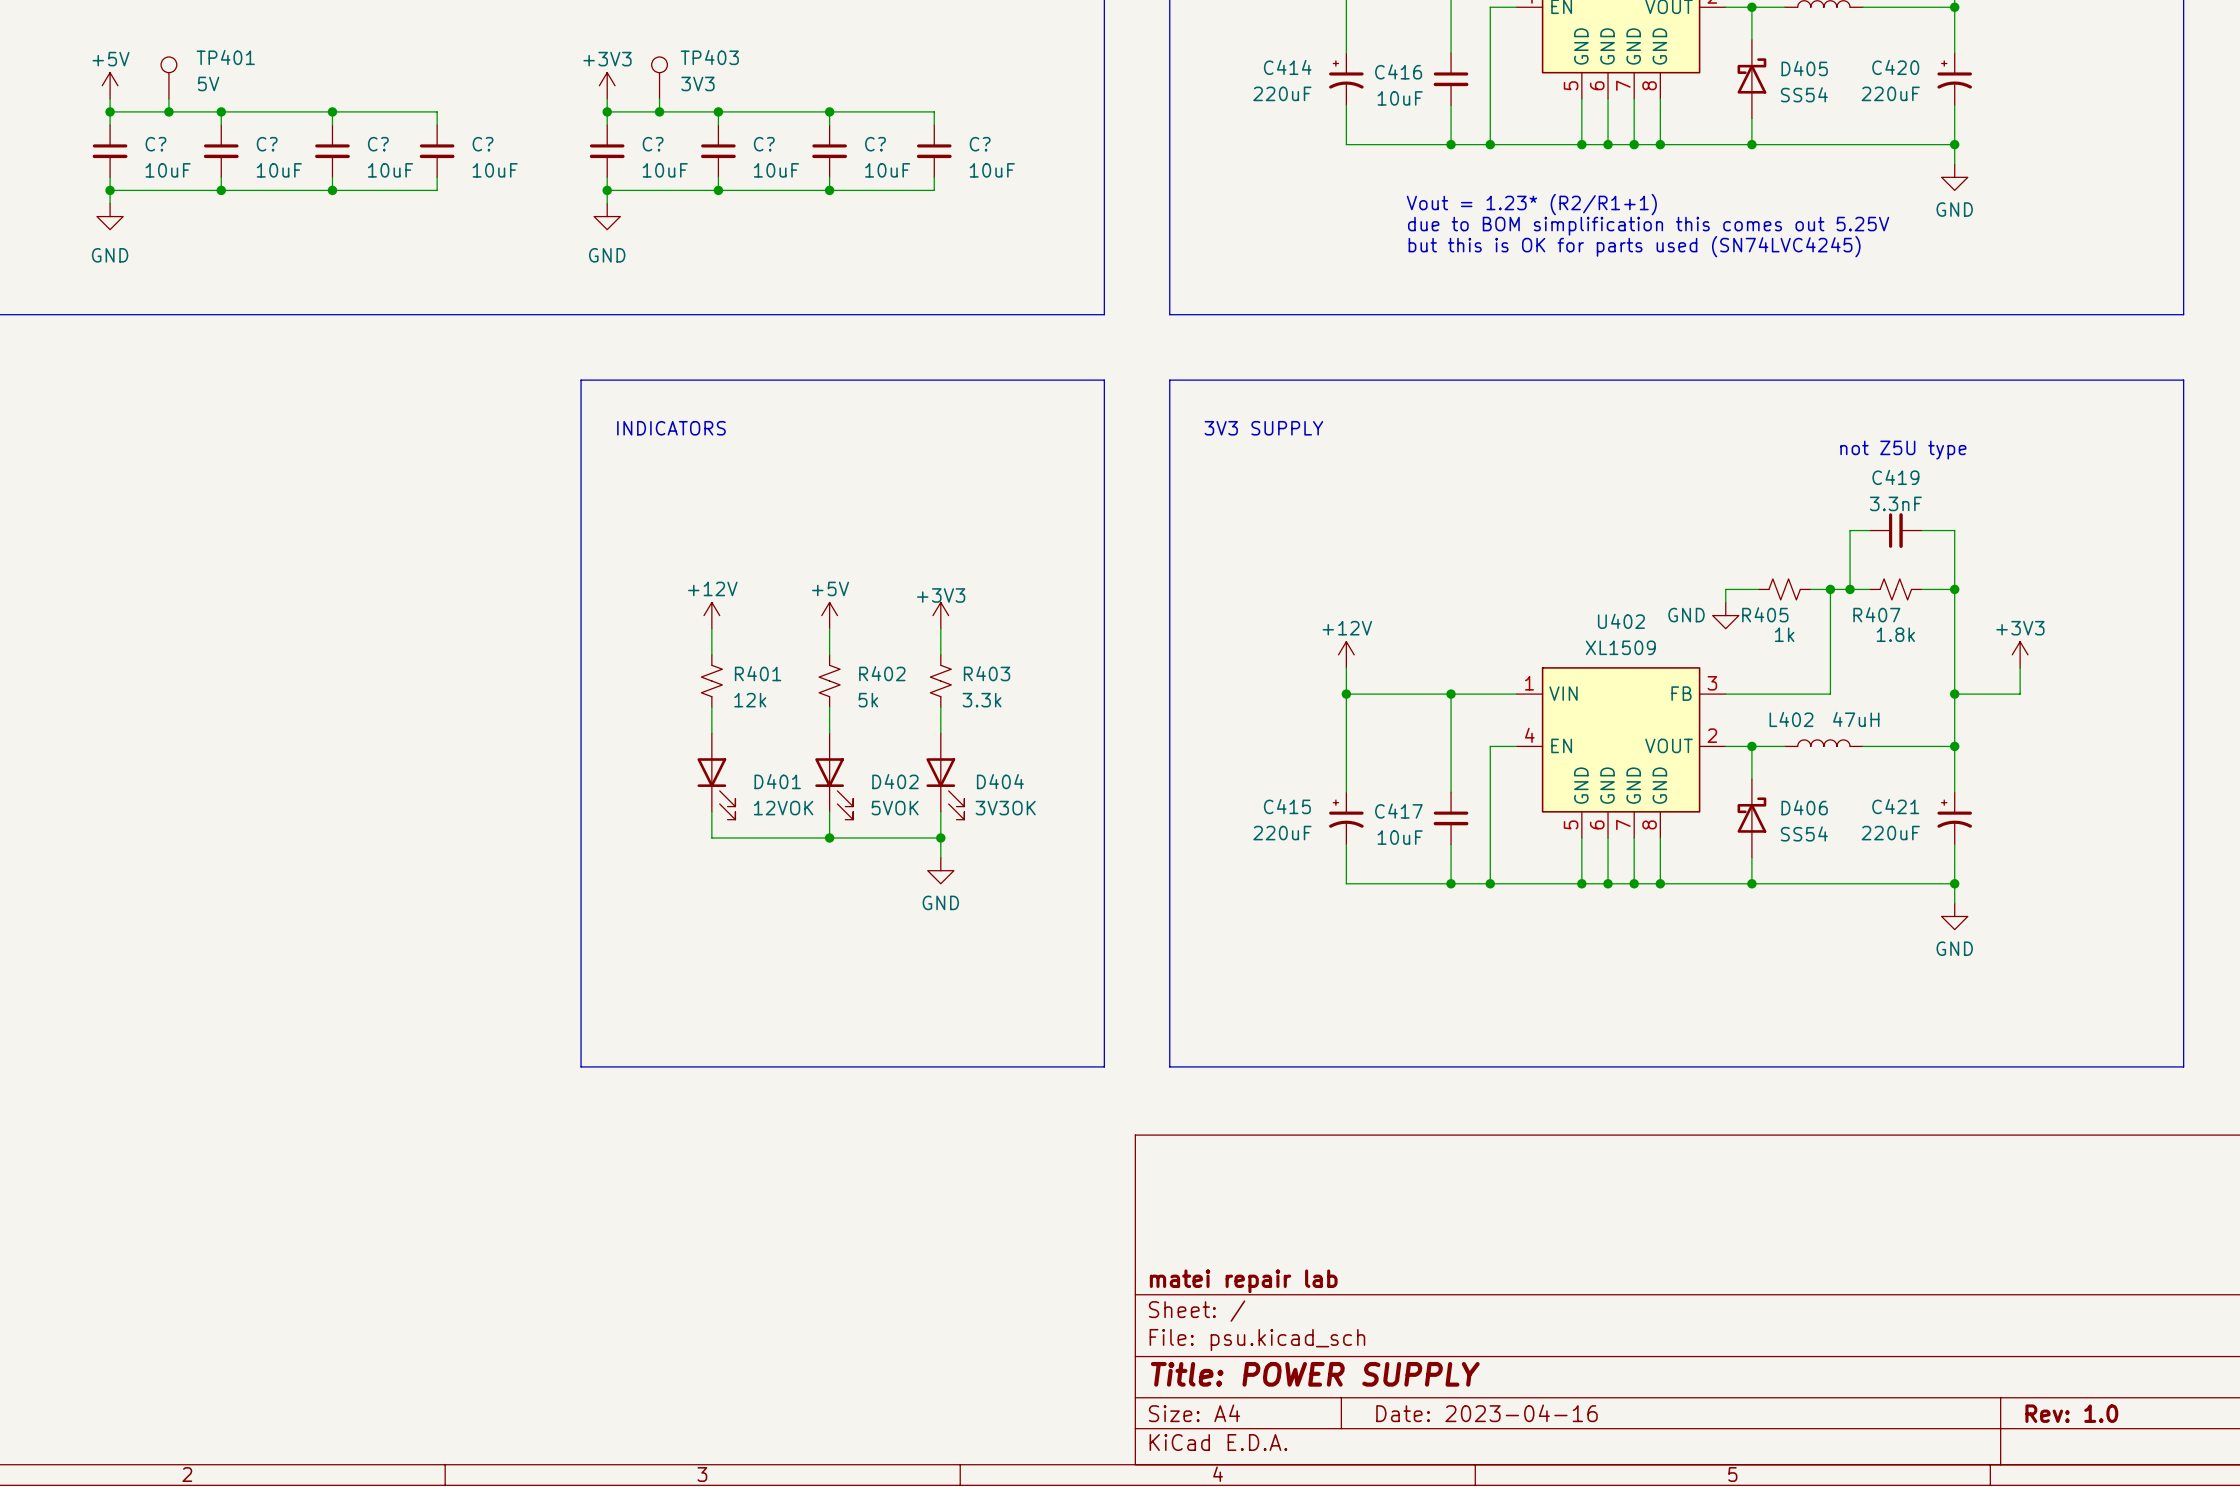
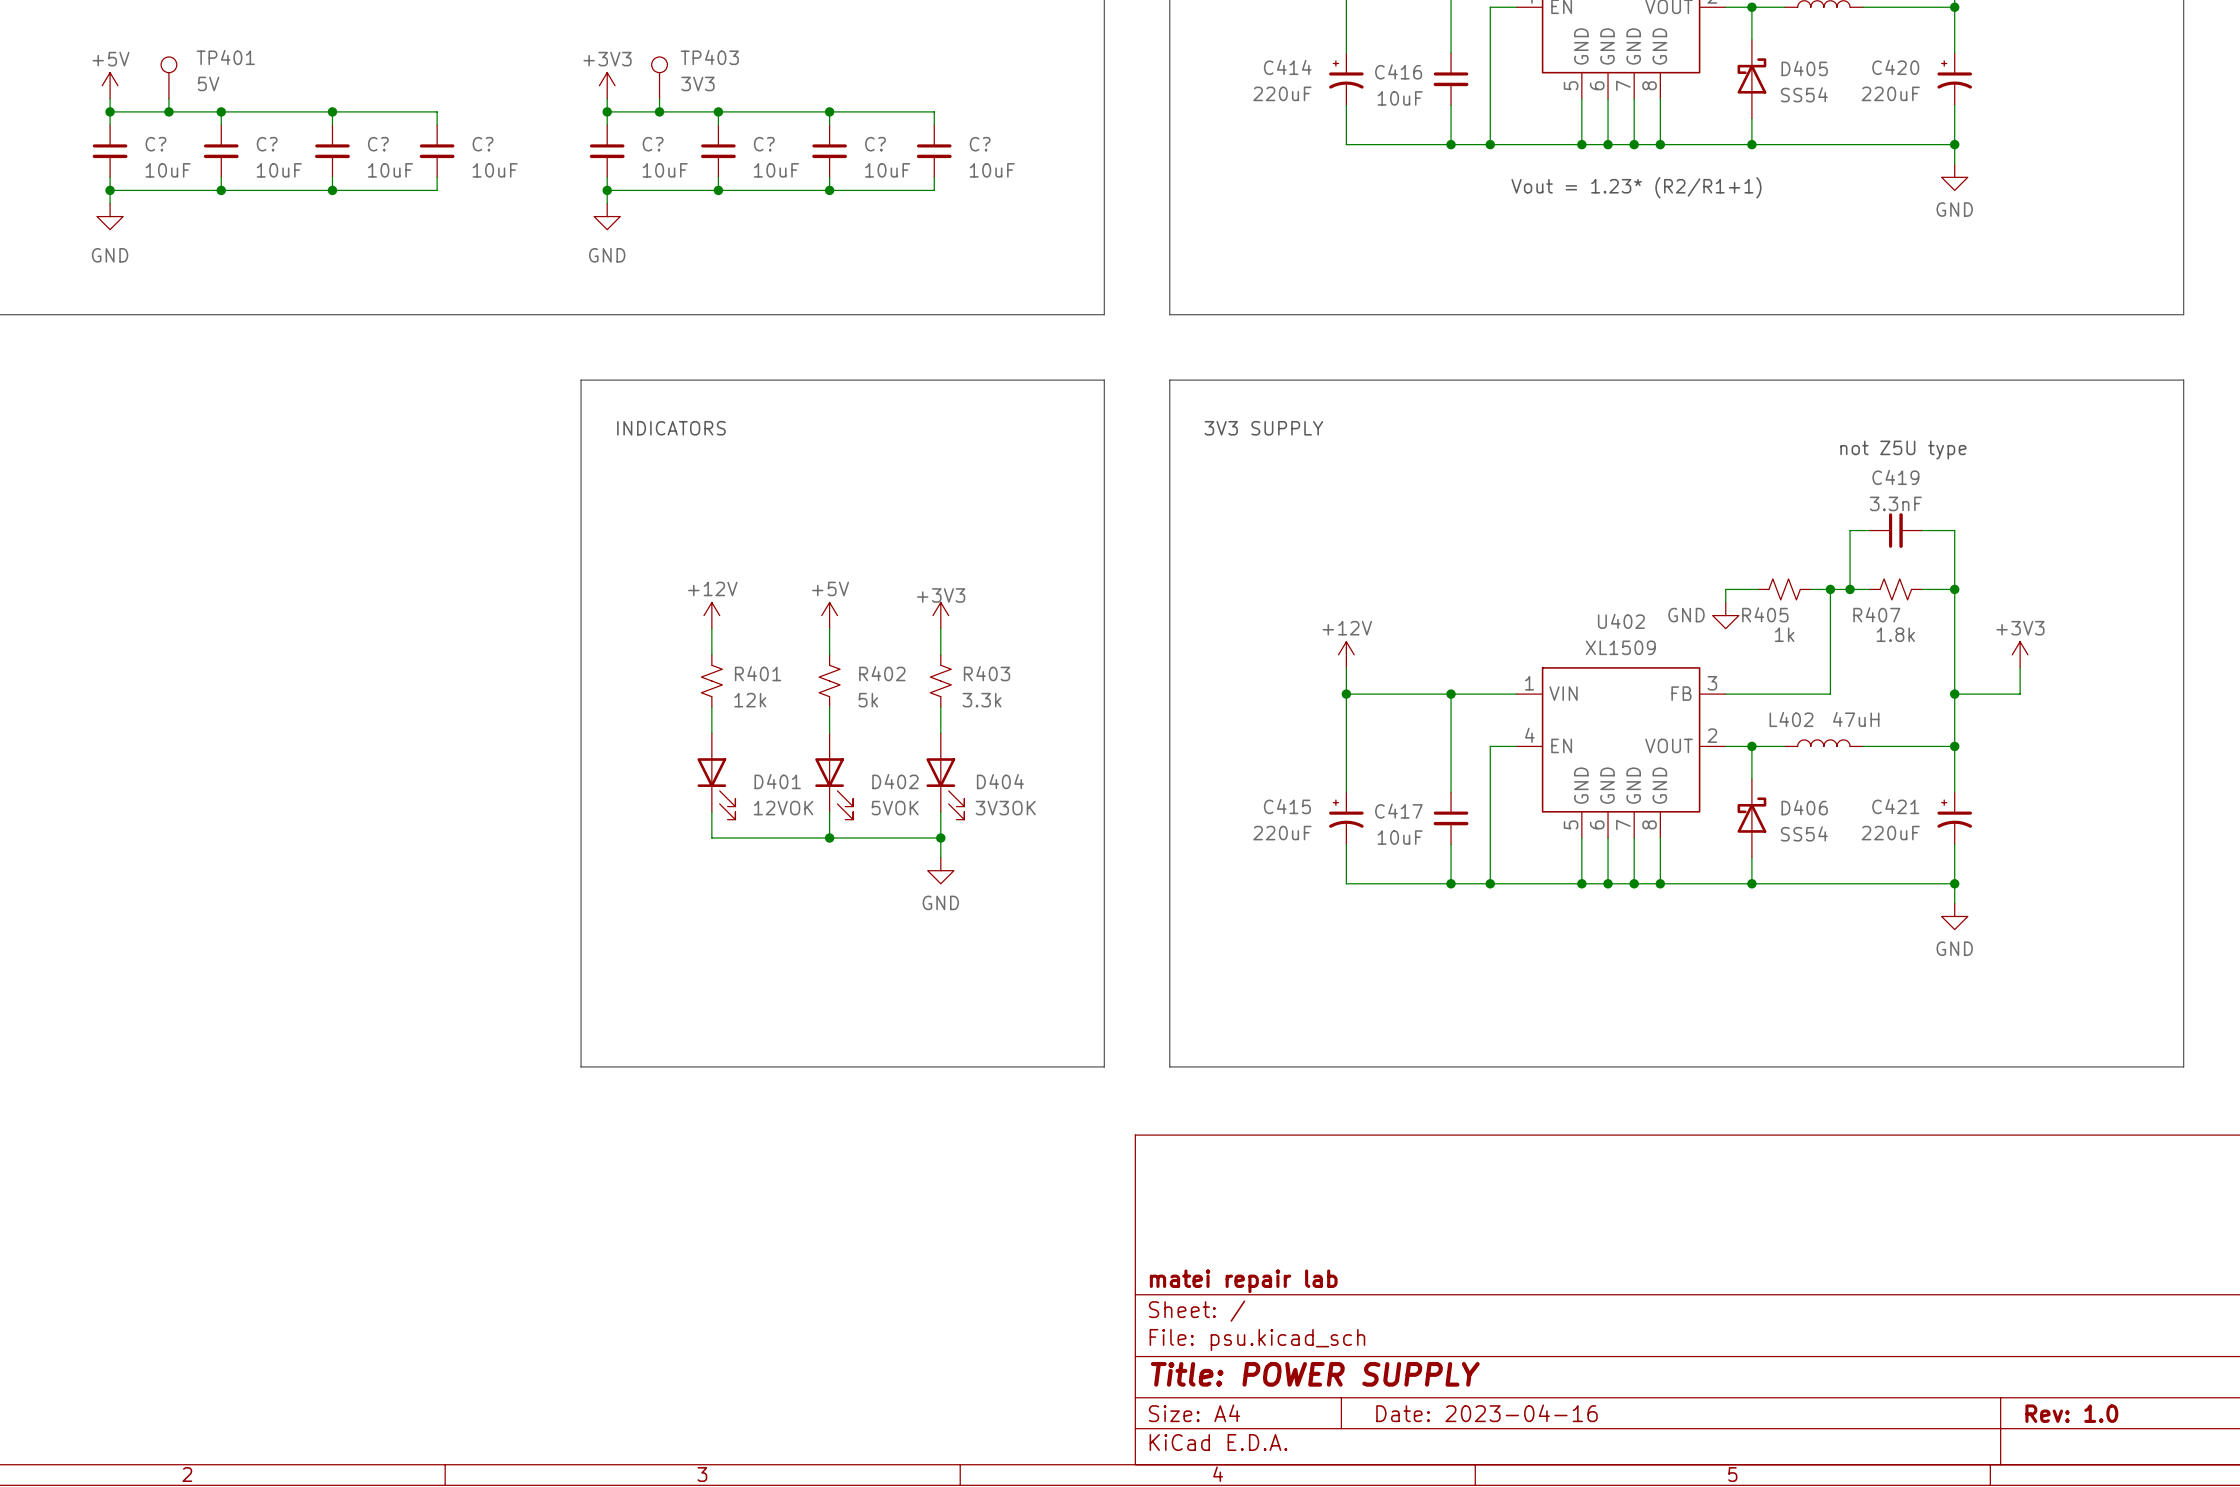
text position: Vout = 1.23* (R2/R1+1) (1531, 204) -> Vout = 1.23* (R2/R1+1) (1636, 187)
text: due to BOM simplification this comes out 5.25V (1648, 226) -> none
text: but this is OK for parts used (SN74LVC4245) (1634, 246) -> none

